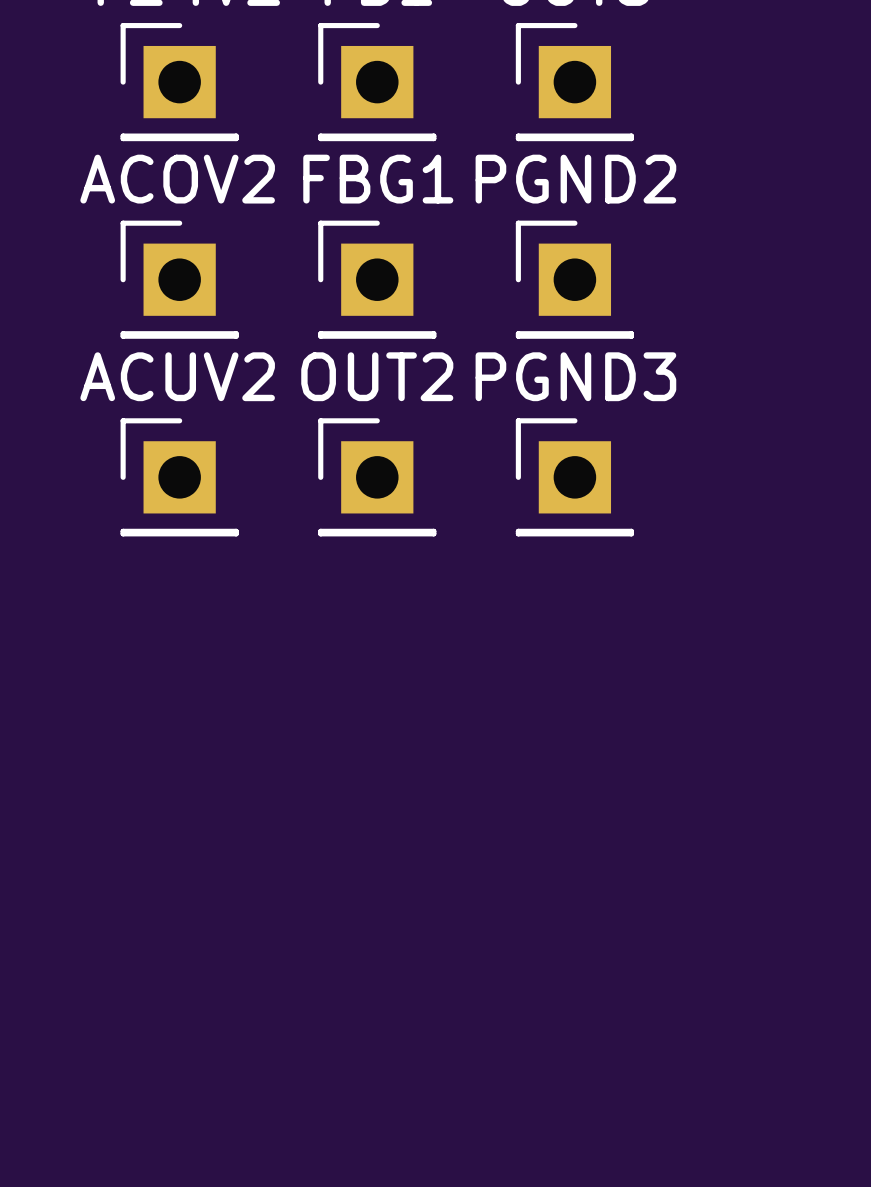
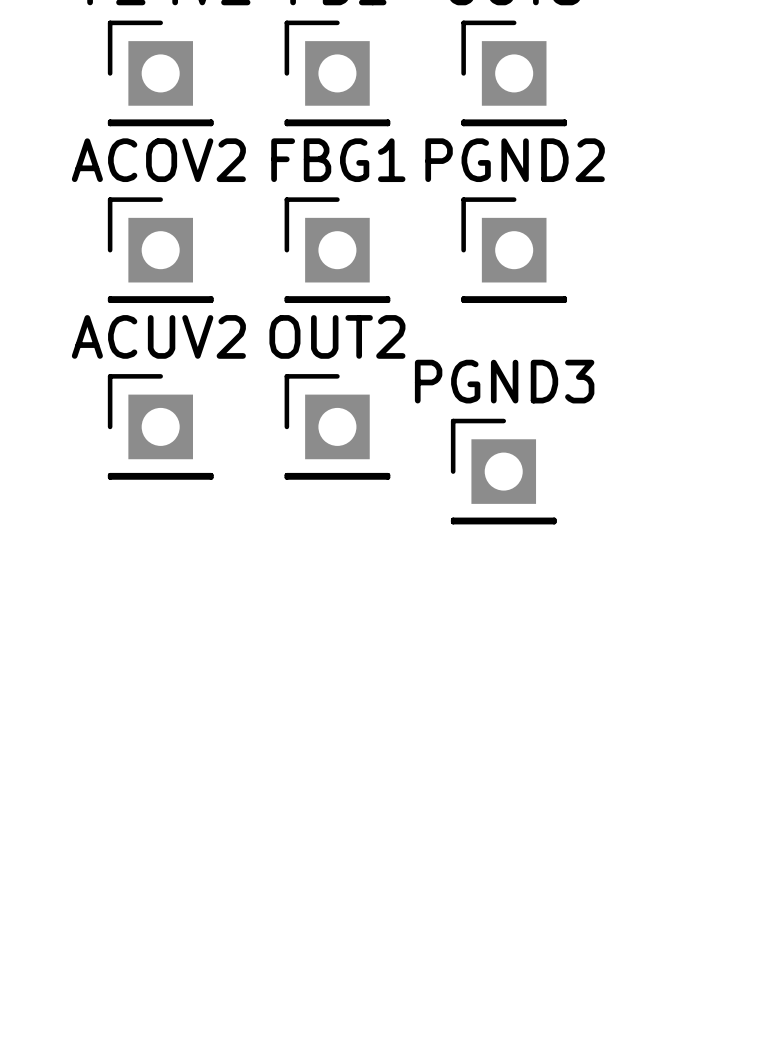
PGND3 position: (574, 477) -> (503, 471)

